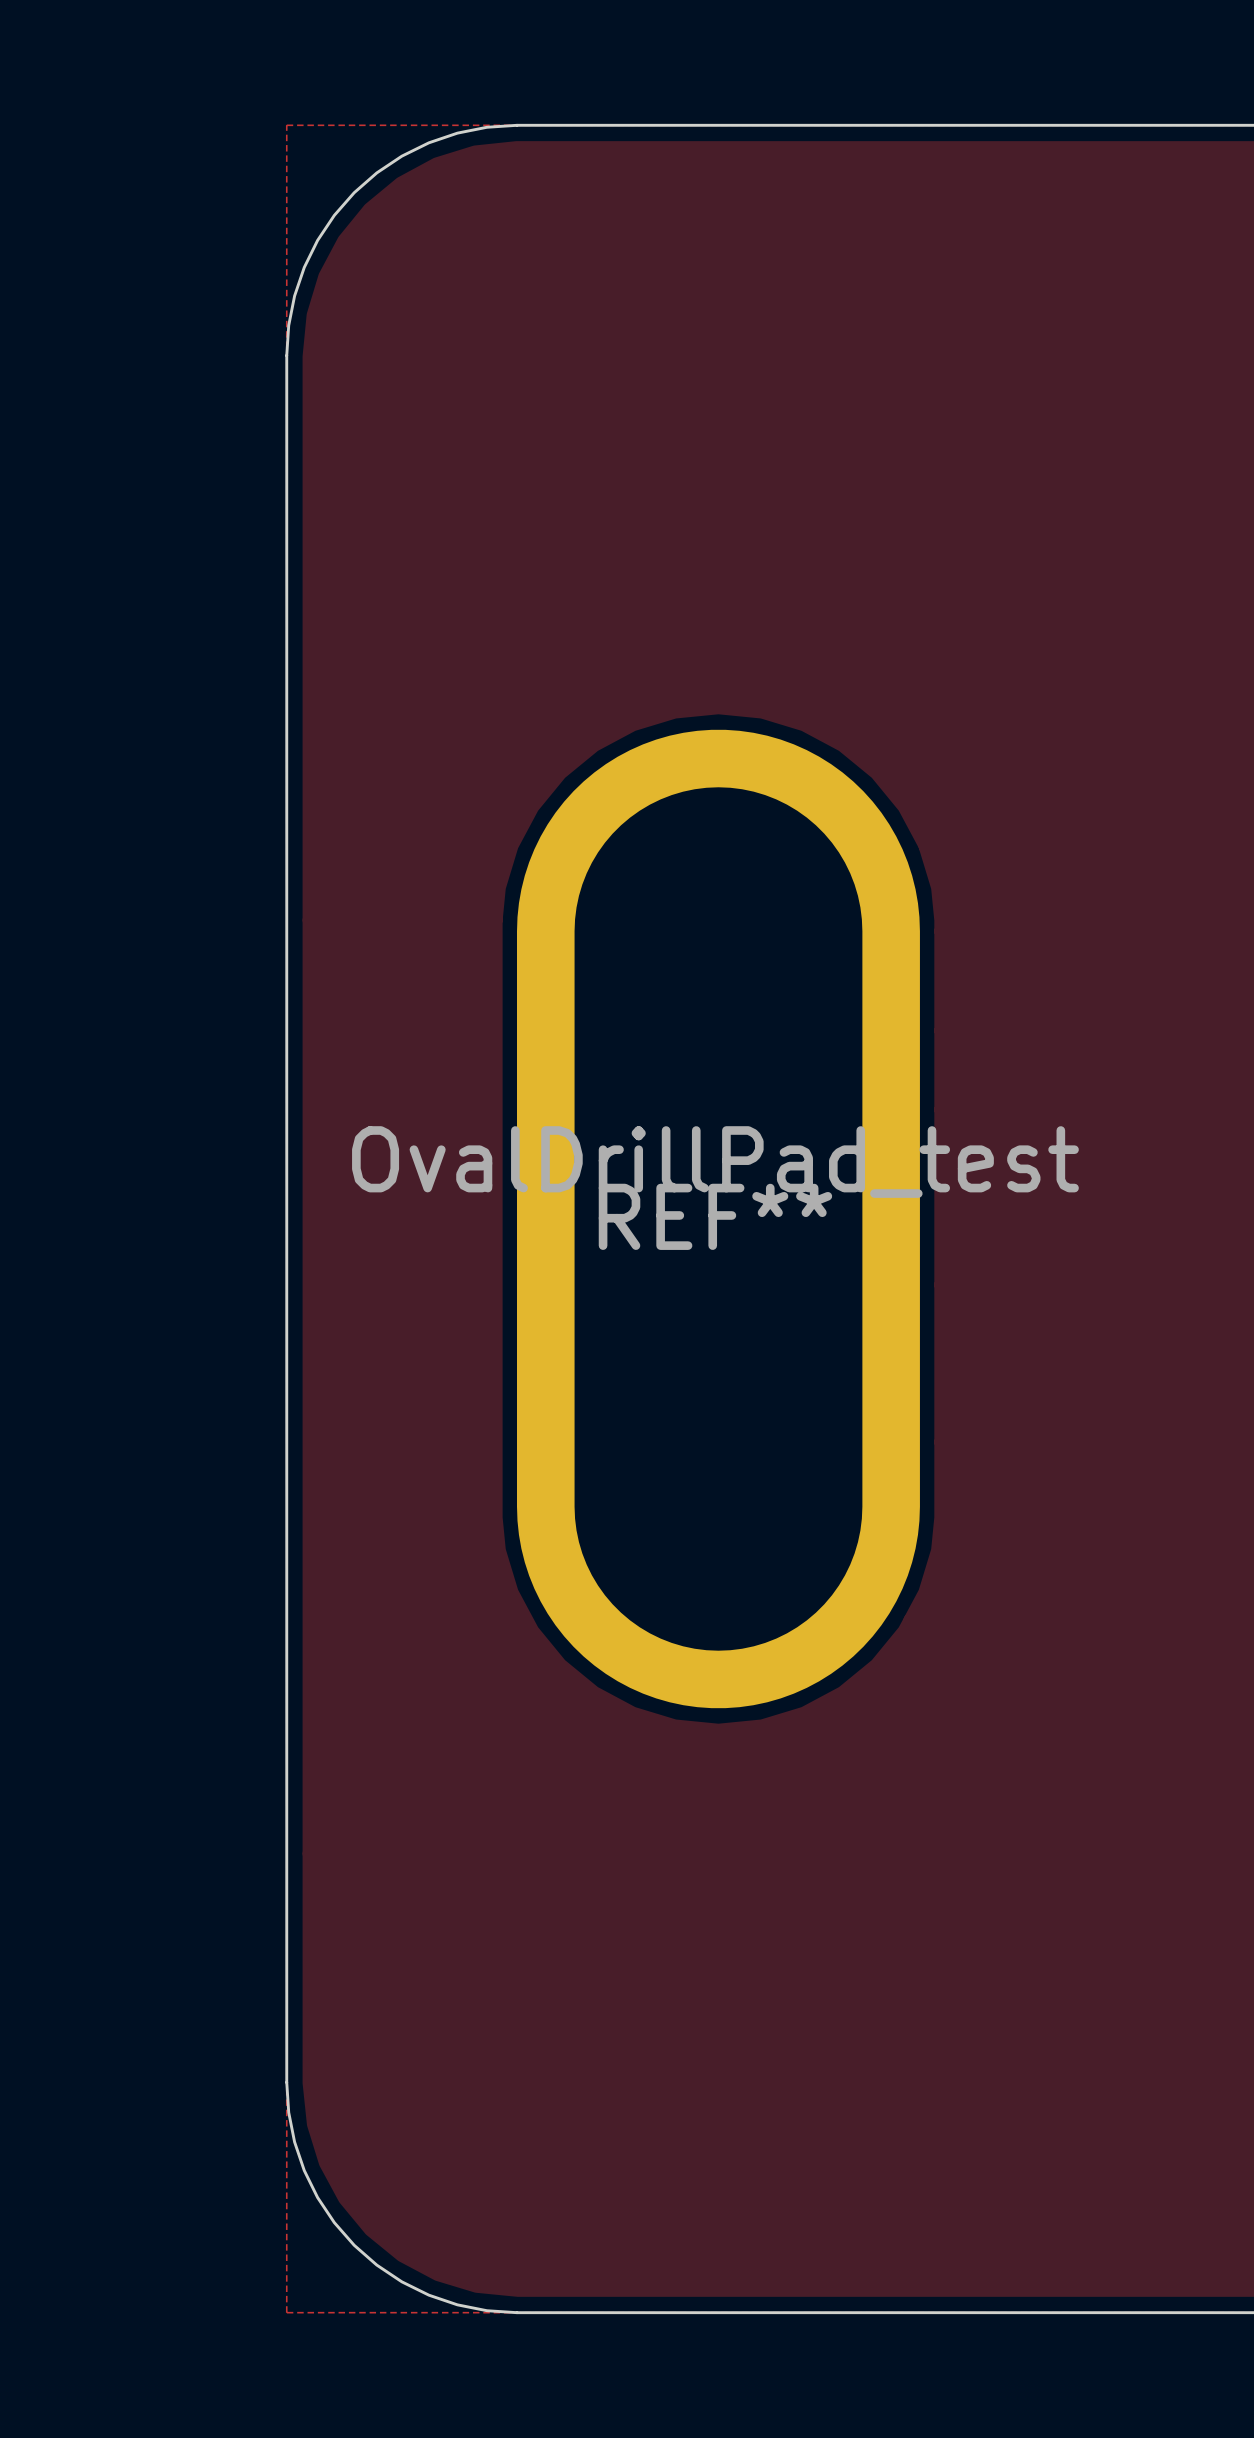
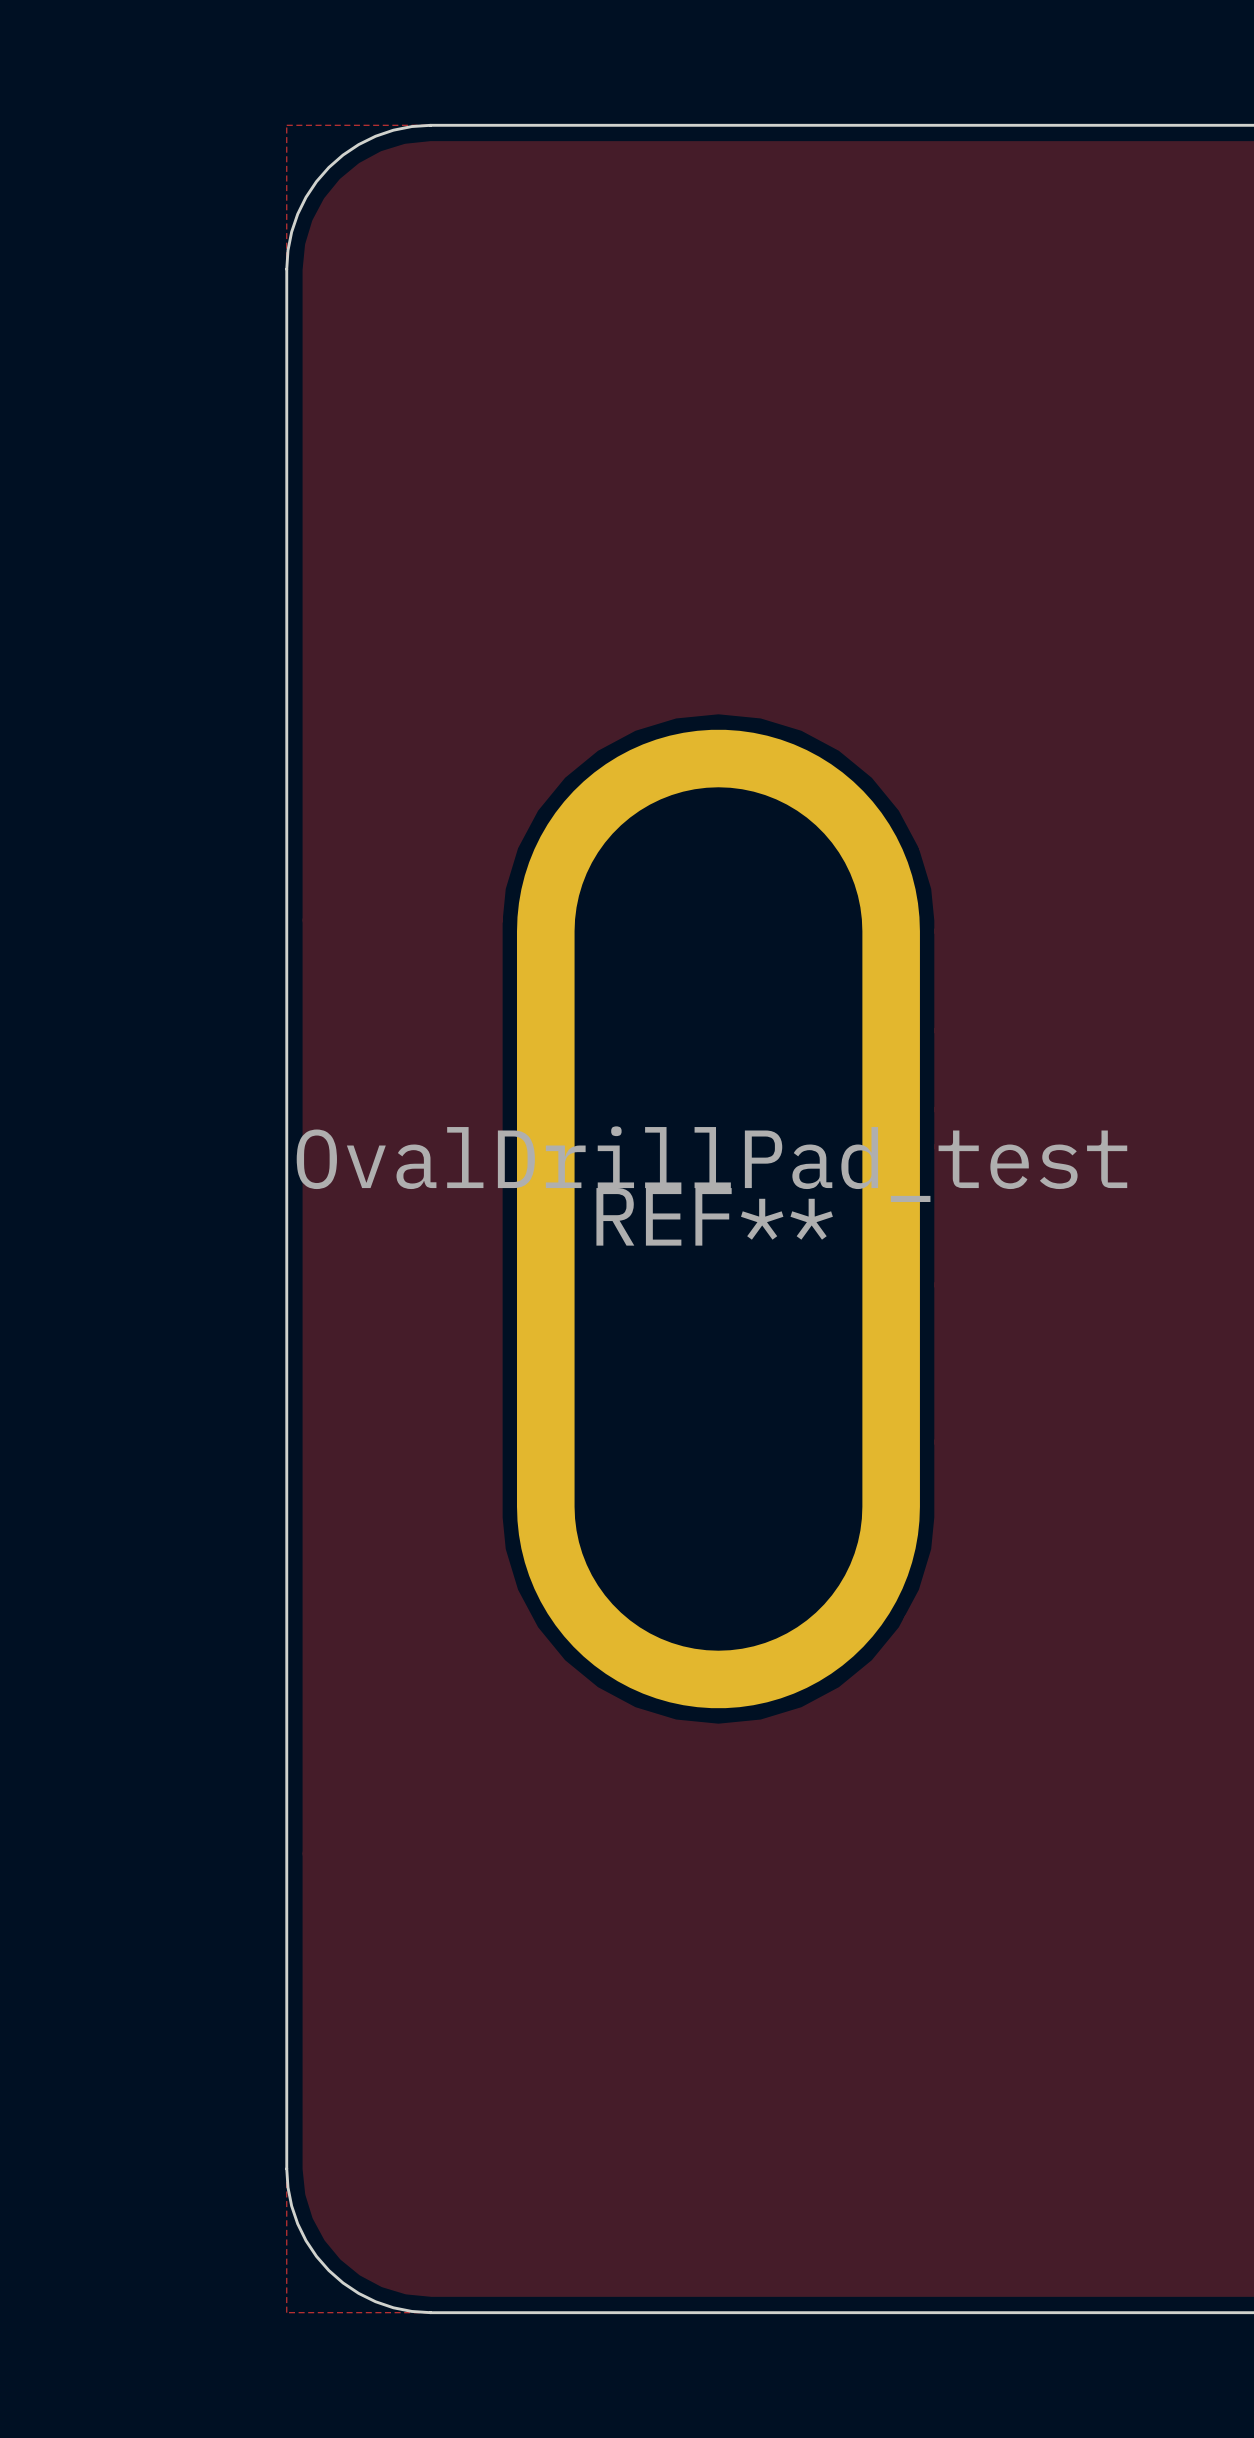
board edge: (517, 125) (486, 127) (457, 133) (428, 142) (401, 156) (376, 172) (354, 192) (334, 215) (317, 240) (304, 267) (294, 295) (288, 325) (286, 355) -> (517, 125) (430, 125) (393, 130) (358, 144) (328, 167) (306, 197) (291, 231) (286, 269) (286, 355)
board edge: (286, 2082) (288, 2112) (294, 2142) (304, 2170) (317, 2197) (334, 2222) (354, 2245) (376, 2265) (401, 2281) (428, 2295) (457, 2304) (486, 2310) (517, 2312) -> (286, 2082) (286, 2168) (291, 2206) (306, 2240) (328, 2270) (358, 2293) (393, 2307) (430, 2312) (517, 2312)

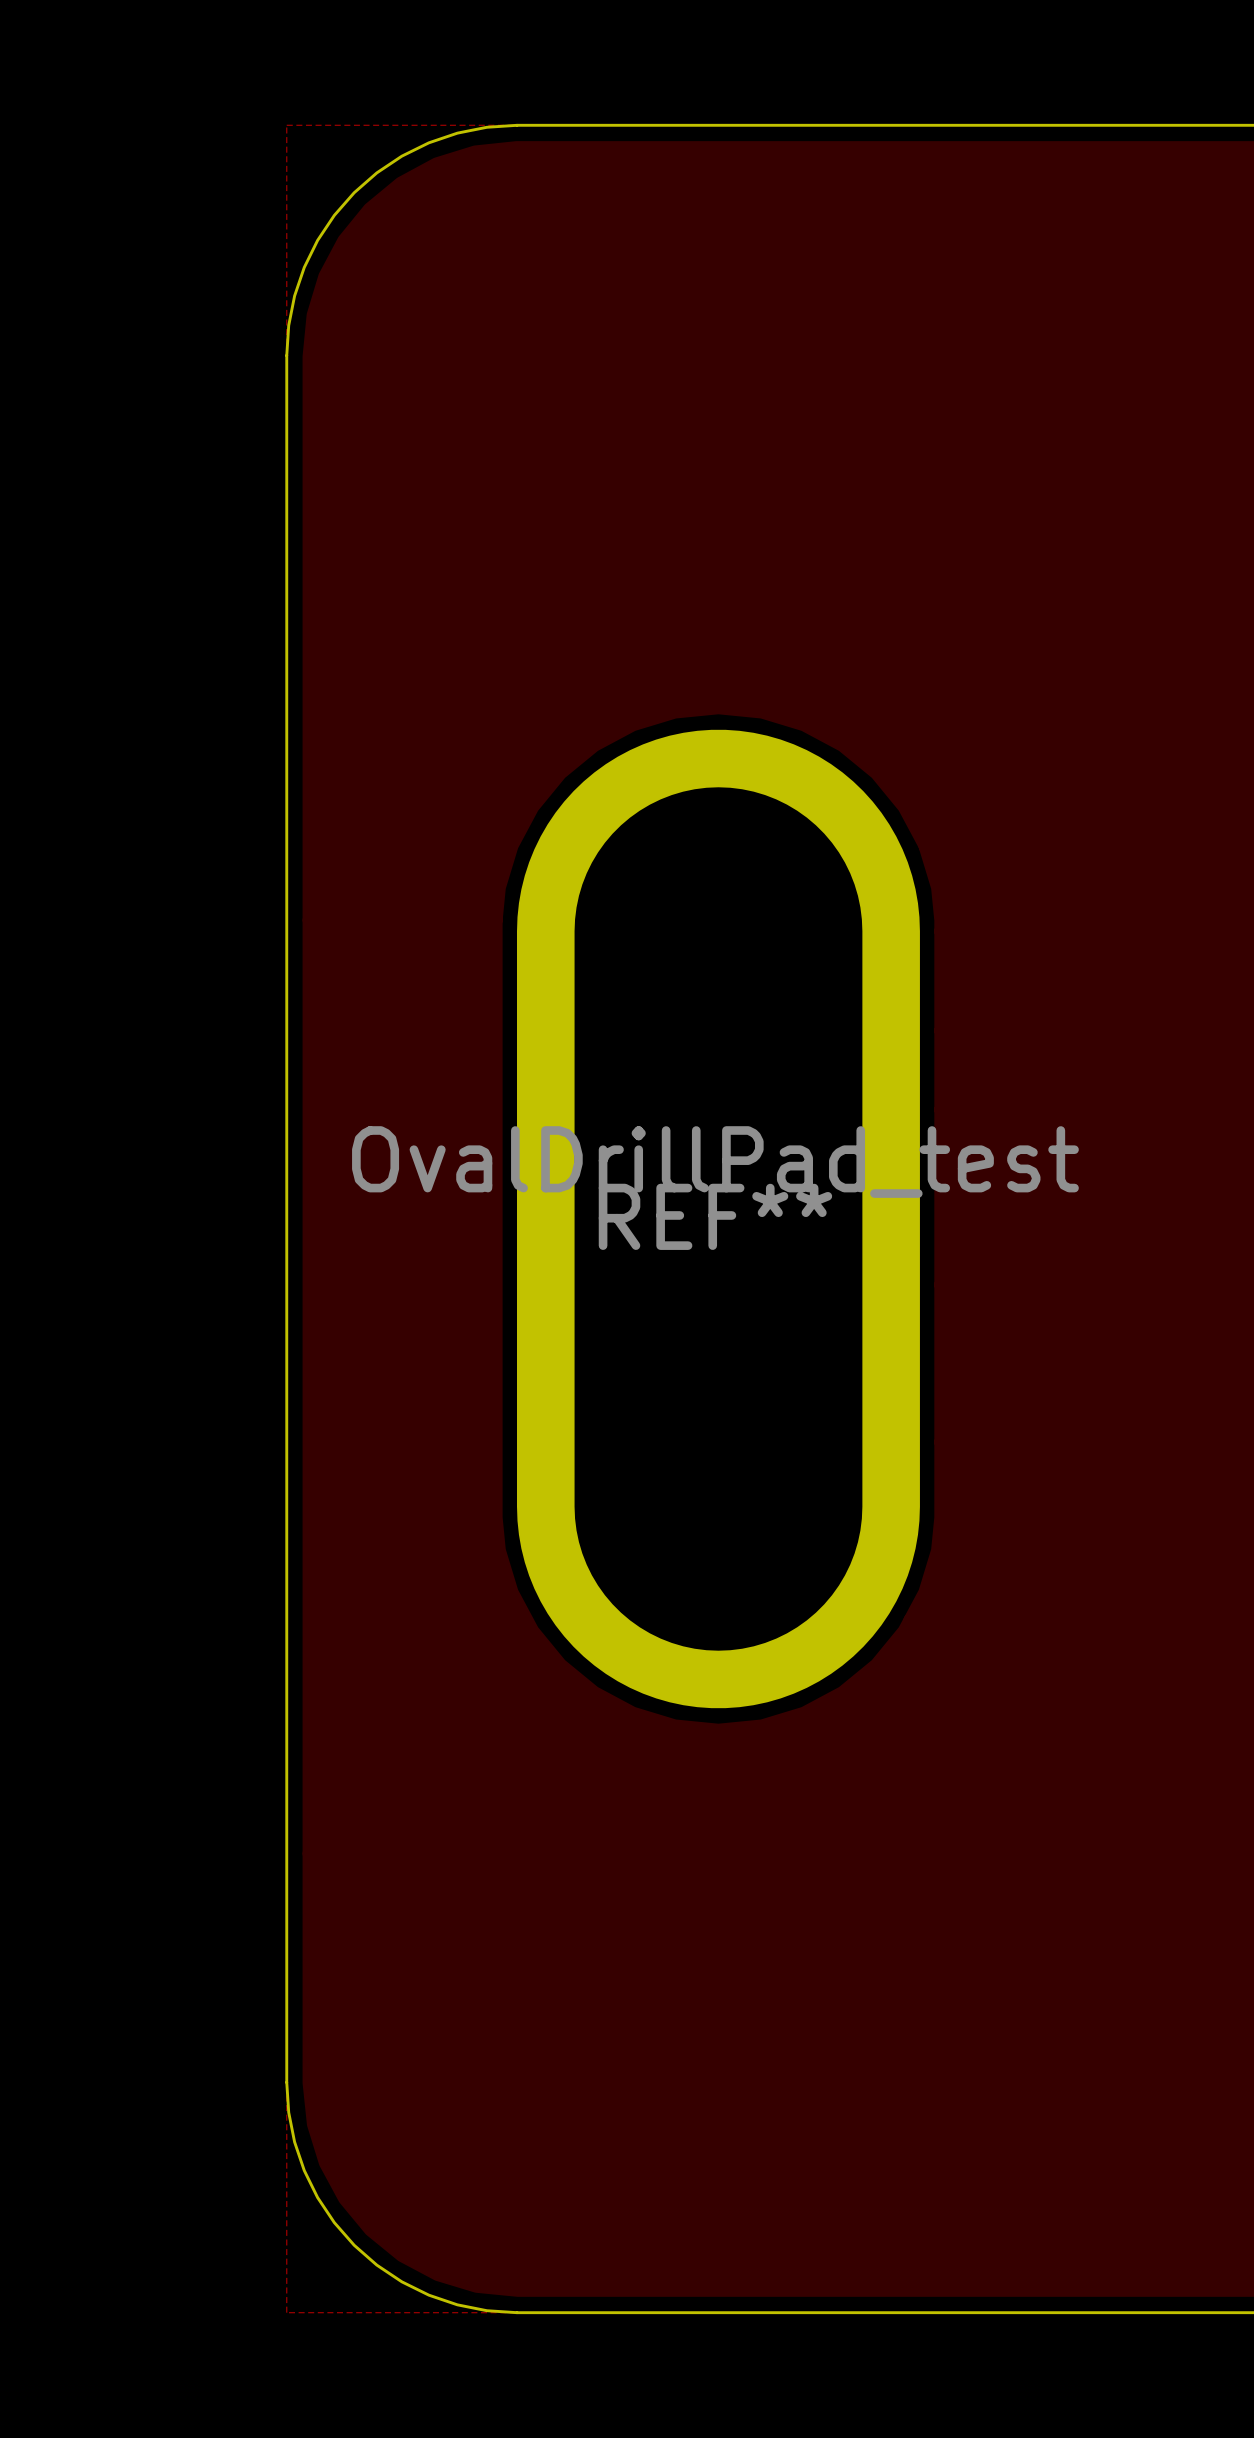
board edge: (517, 125) (430, 125) (393, 130) (358, 144) (328, 167) (306, 197) (291, 231) (286, 269) (286, 355) -> (517, 125) (486, 127) (457, 133) (428, 142) (401, 156) (376, 172) (354, 192) (334, 215) (317, 240) (304, 267) (294, 295) (288, 325) (286, 355)
board edge: (286, 2082) (286, 2168) (291, 2206) (306, 2240) (328, 2270) (358, 2293) (393, 2307) (430, 2312) (517, 2312) -> (286, 2082) (288, 2112) (294, 2142) (304, 2170) (317, 2197) (334, 2222) (354, 2245) (376, 2265) (401, 2281) (428, 2295) (457, 2304) (486, 2310) (517, 2312)

